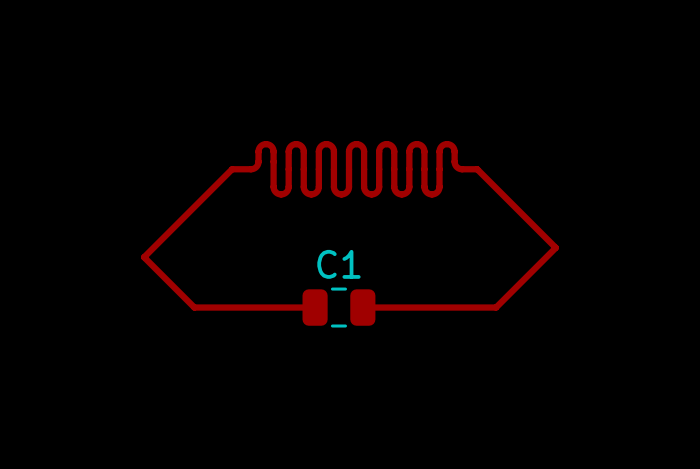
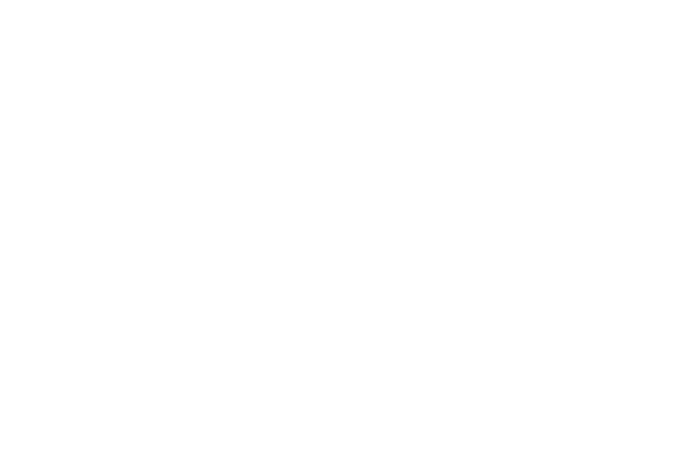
track: (315, 307) (194, 307) (144, 257) (232, 169) (251, 169) (256, 167) (259, 148) (266, 144) (270, 145) (273, 150) (273, 188) (276, 192) (281, 194) (285, 192) (288, 188) (288, 150) (294, 144) (299, 144) (303, 148) (303, 187) (306, 192) (311, 194) (315, 192) (318, 188) (318, 150) (323, 144) (329, 144) (333, 148) (333, 187) (336, 192) (341, 194) (346, 192) (348, 188) (349, 150) (353, 144) (359, 144) (363, 148) (364, 187) (367, 192) (371, 194) (376, 192) (378, 188) (379, 150) (382, 145) (388, 144) (393, 148) (394, 187) (396, 192) (401, 194) (406, 192) (409, 187) (409, 148) (415, 144) (422, 146) (424, 151) (424, 188) (427, 192) (431, 194) (436, 192) (439, 187) (440, 148) (444, 144) (449, 144) (454, 149) (454, 162) (456, 167) (461, 169) (477, 169) (555, 247) (496, 307) (362, 307) -> none
C1: (338, 307) -> none

